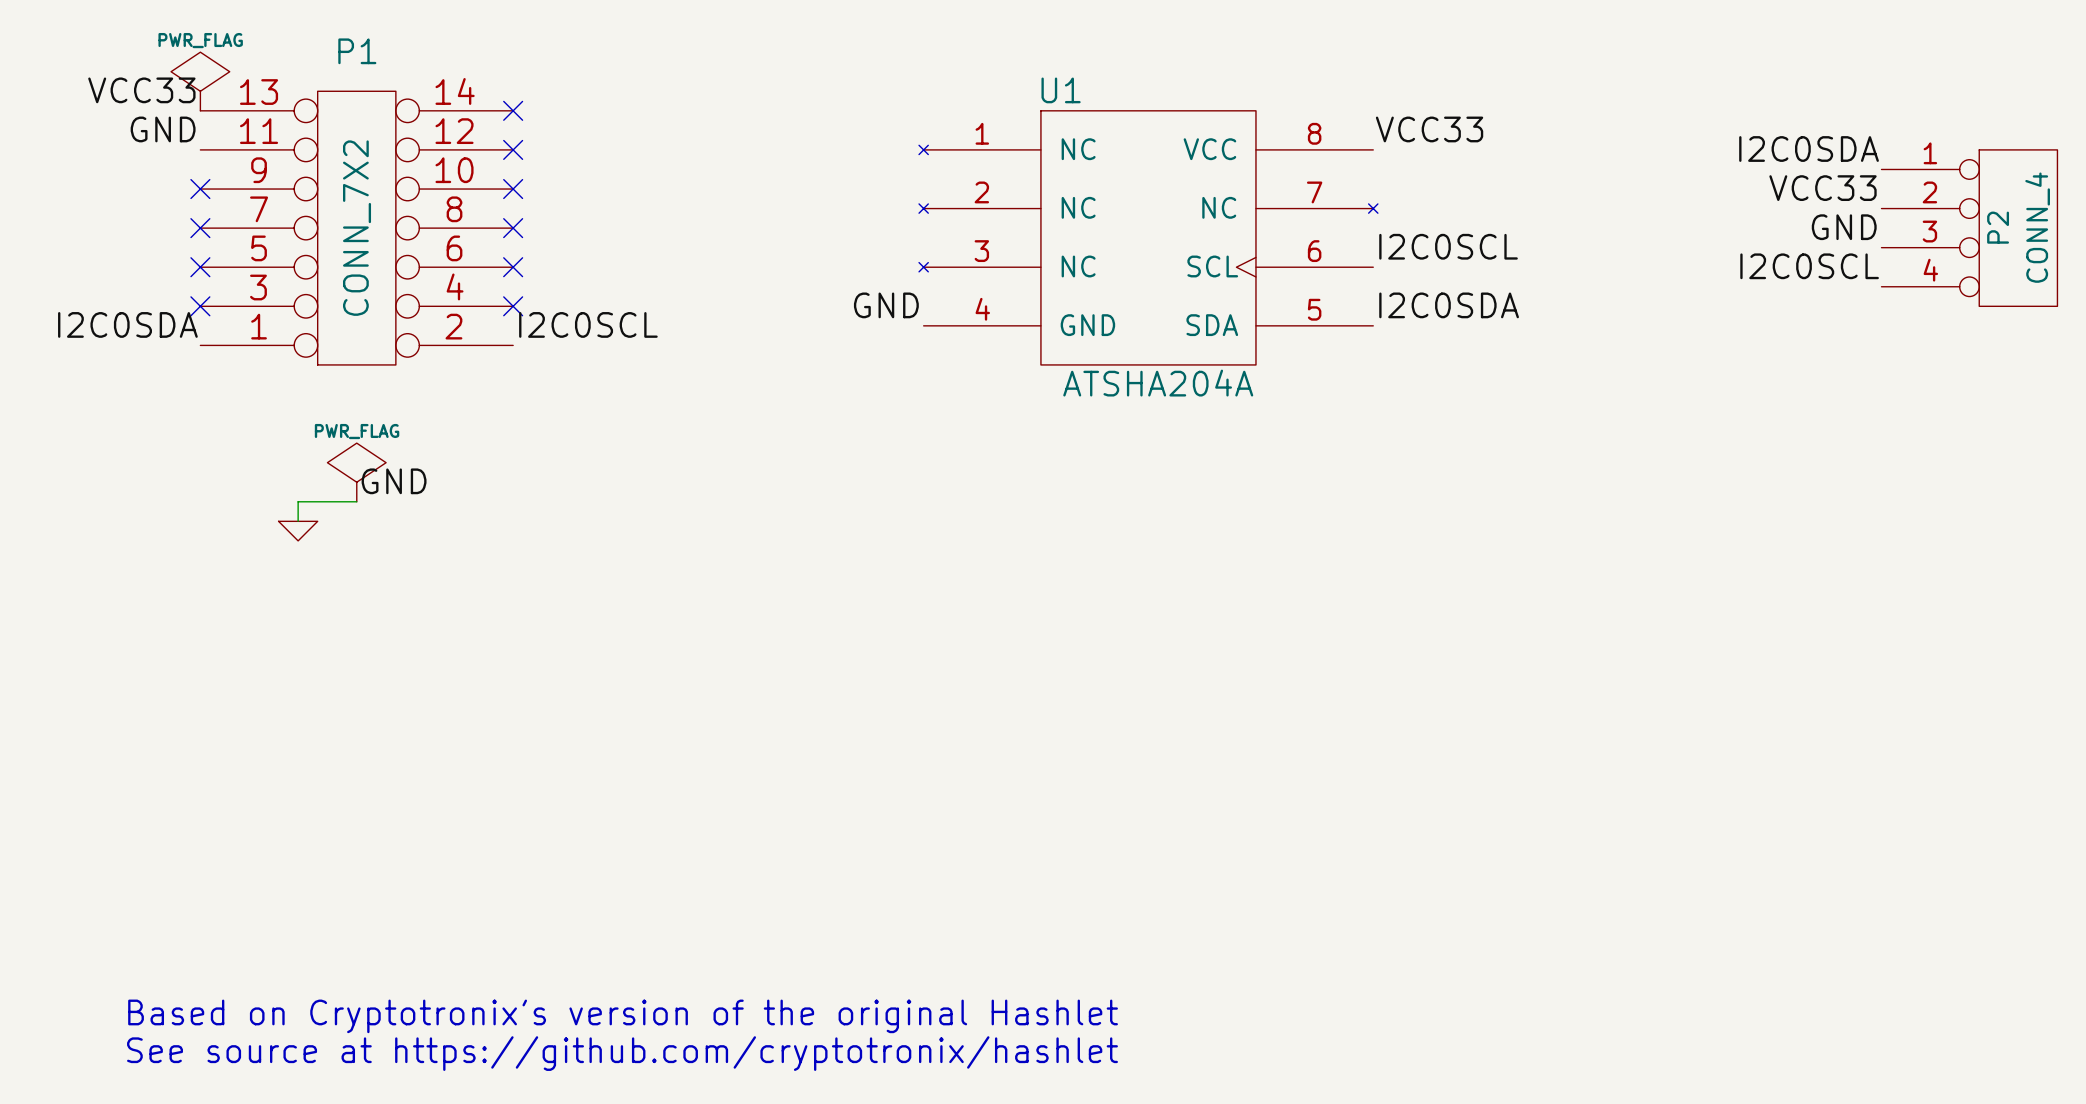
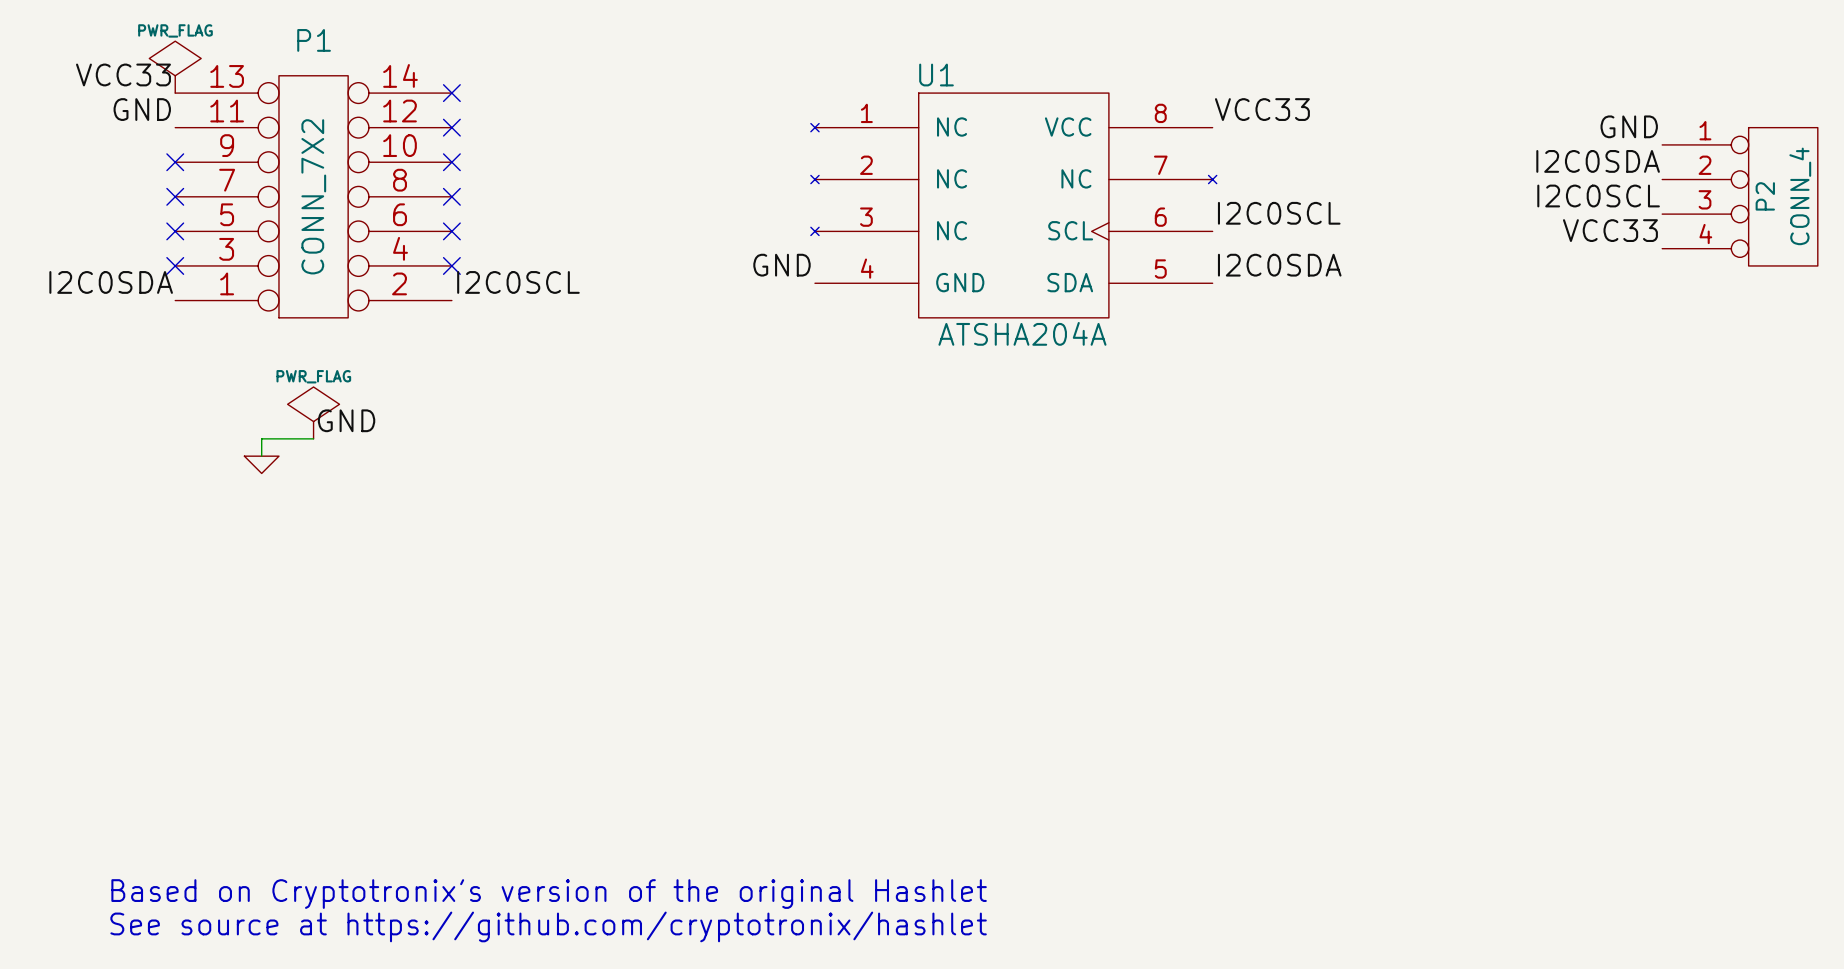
label: I2C0SDA (1809, 149) -> GND (1629, 126)
label: VCC33 (1823, 188) -> I2C0SDA (1598, 161)
label: GND (1844, 227) -> I2C0SCL (1598, 196)
label: I2C0SCL (1809, 266) -> VCC33 (1610, 230)

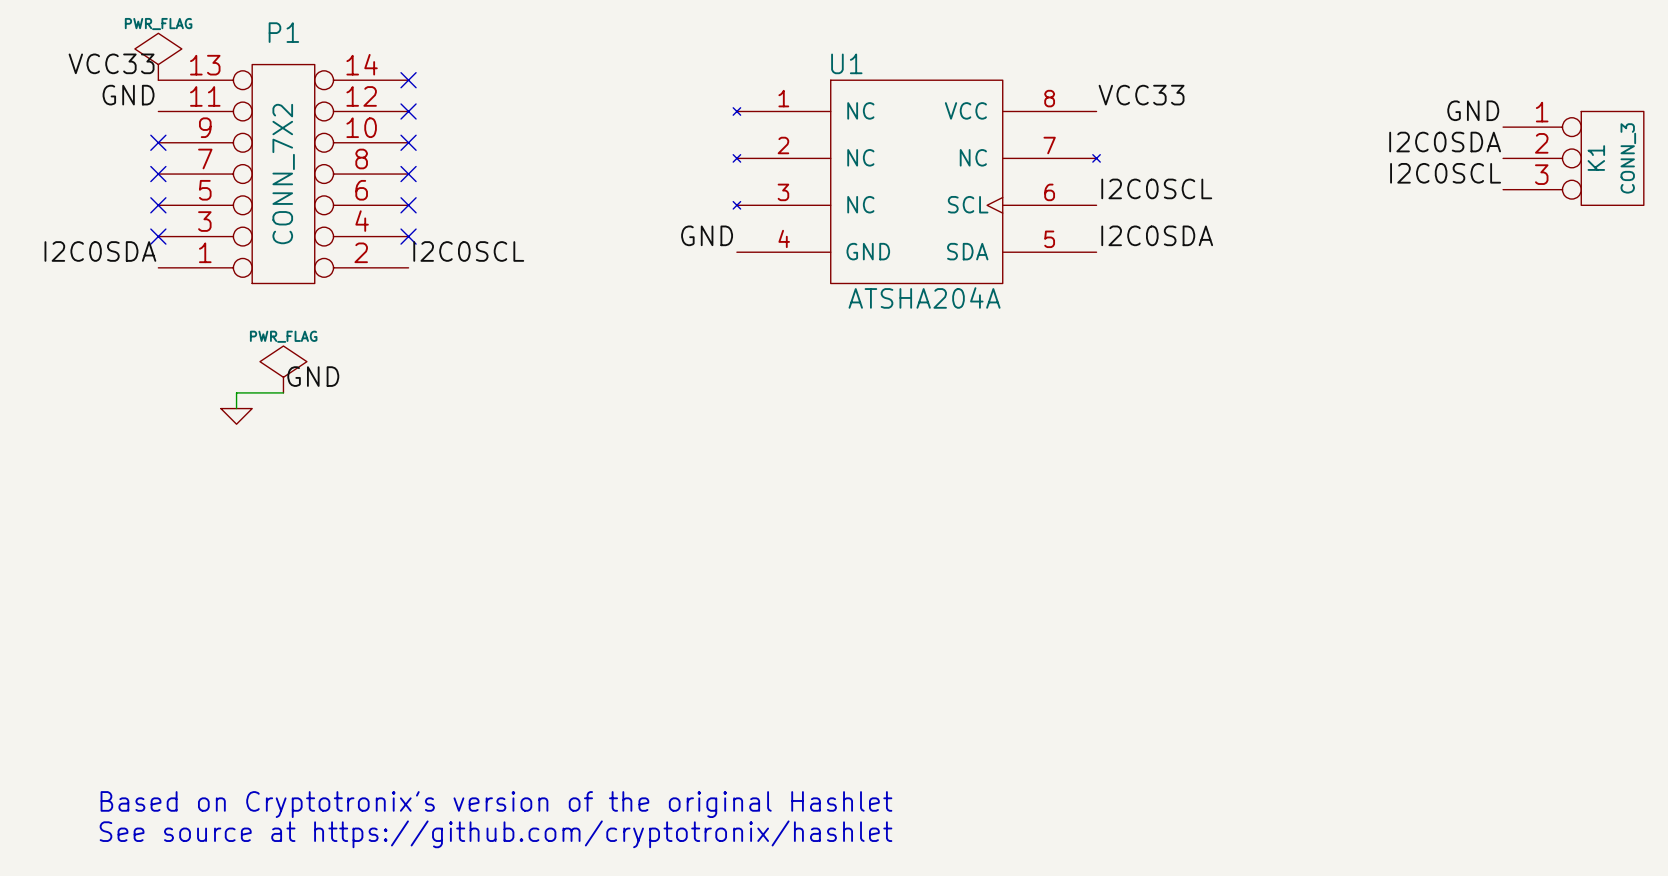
K1: none -> CONN_3 (1573, 158)
P2: CONN_4 (1740, 196) -> none
label: VCC33 (1610, 230) -> none

